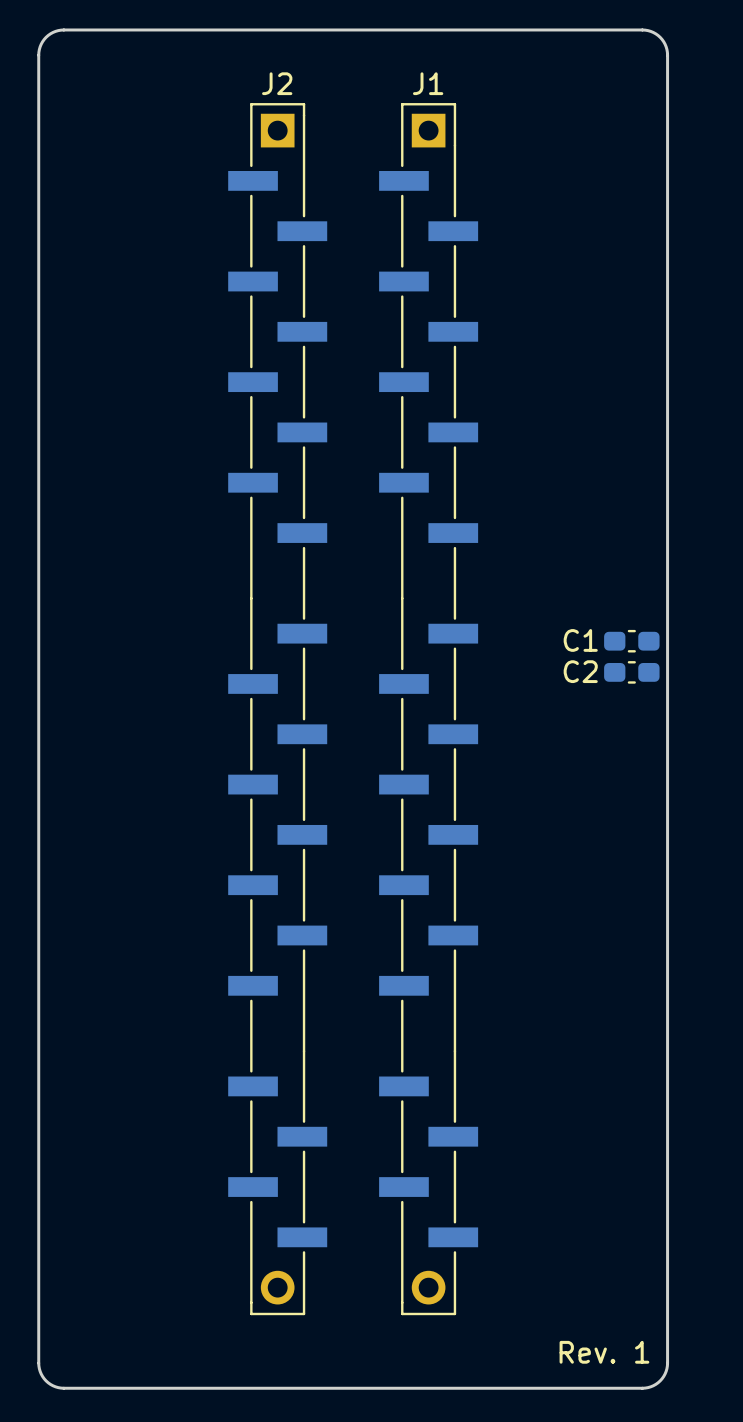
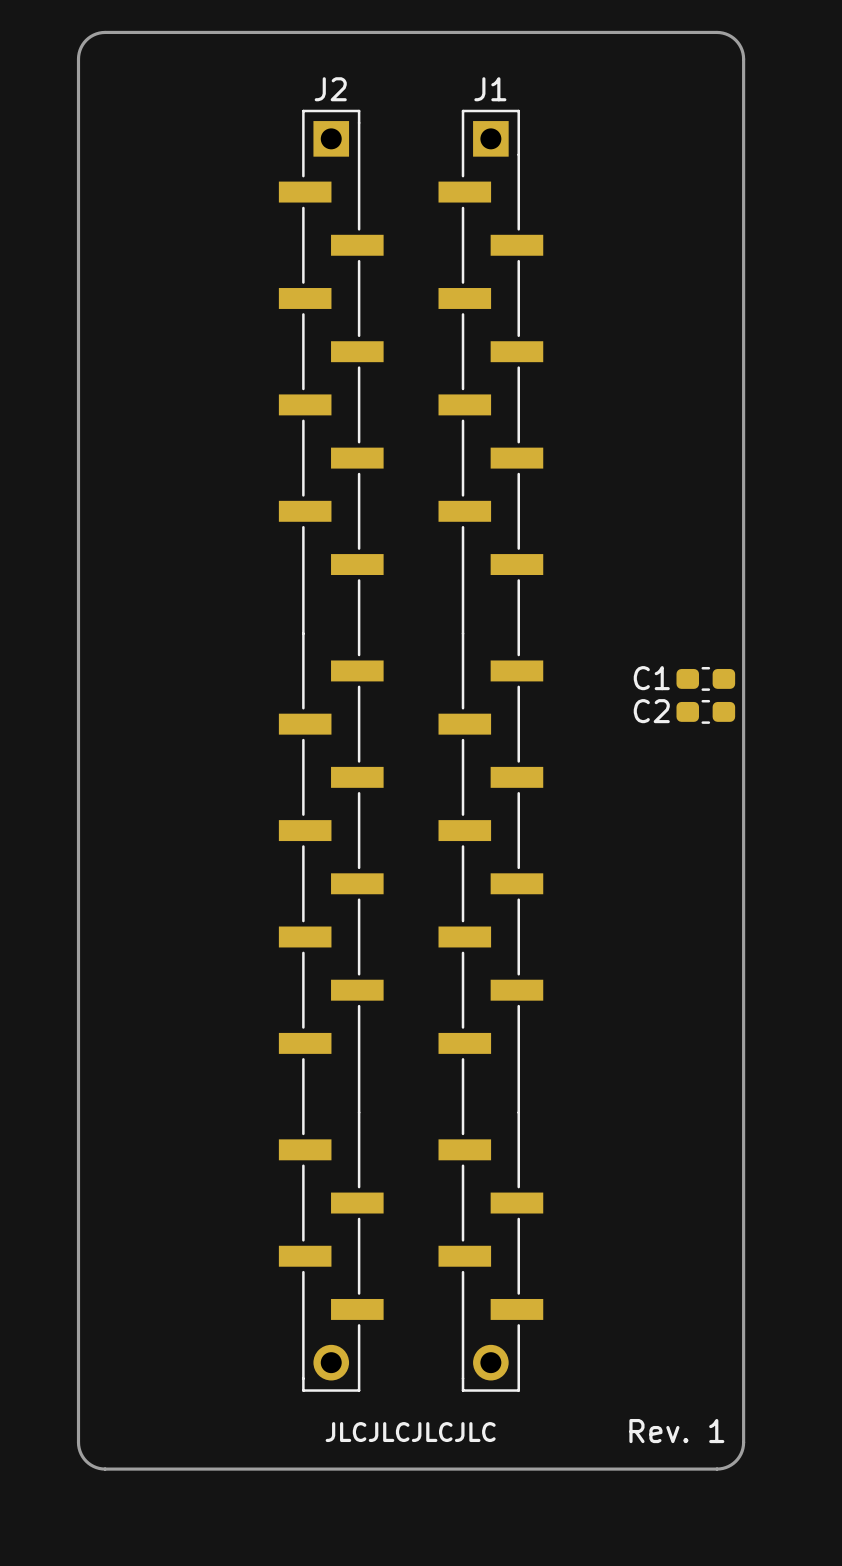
text: none -> JLCJLCJLCJLC (410, 1432)

